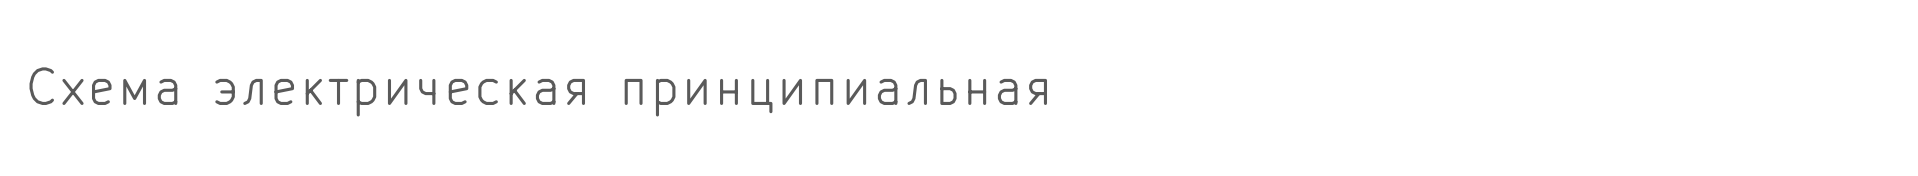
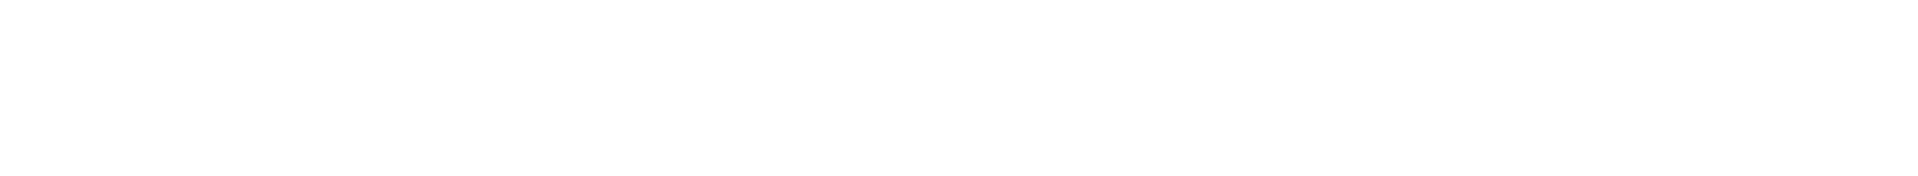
text: Схема электрическая принципиальная (538, 91) -> none

